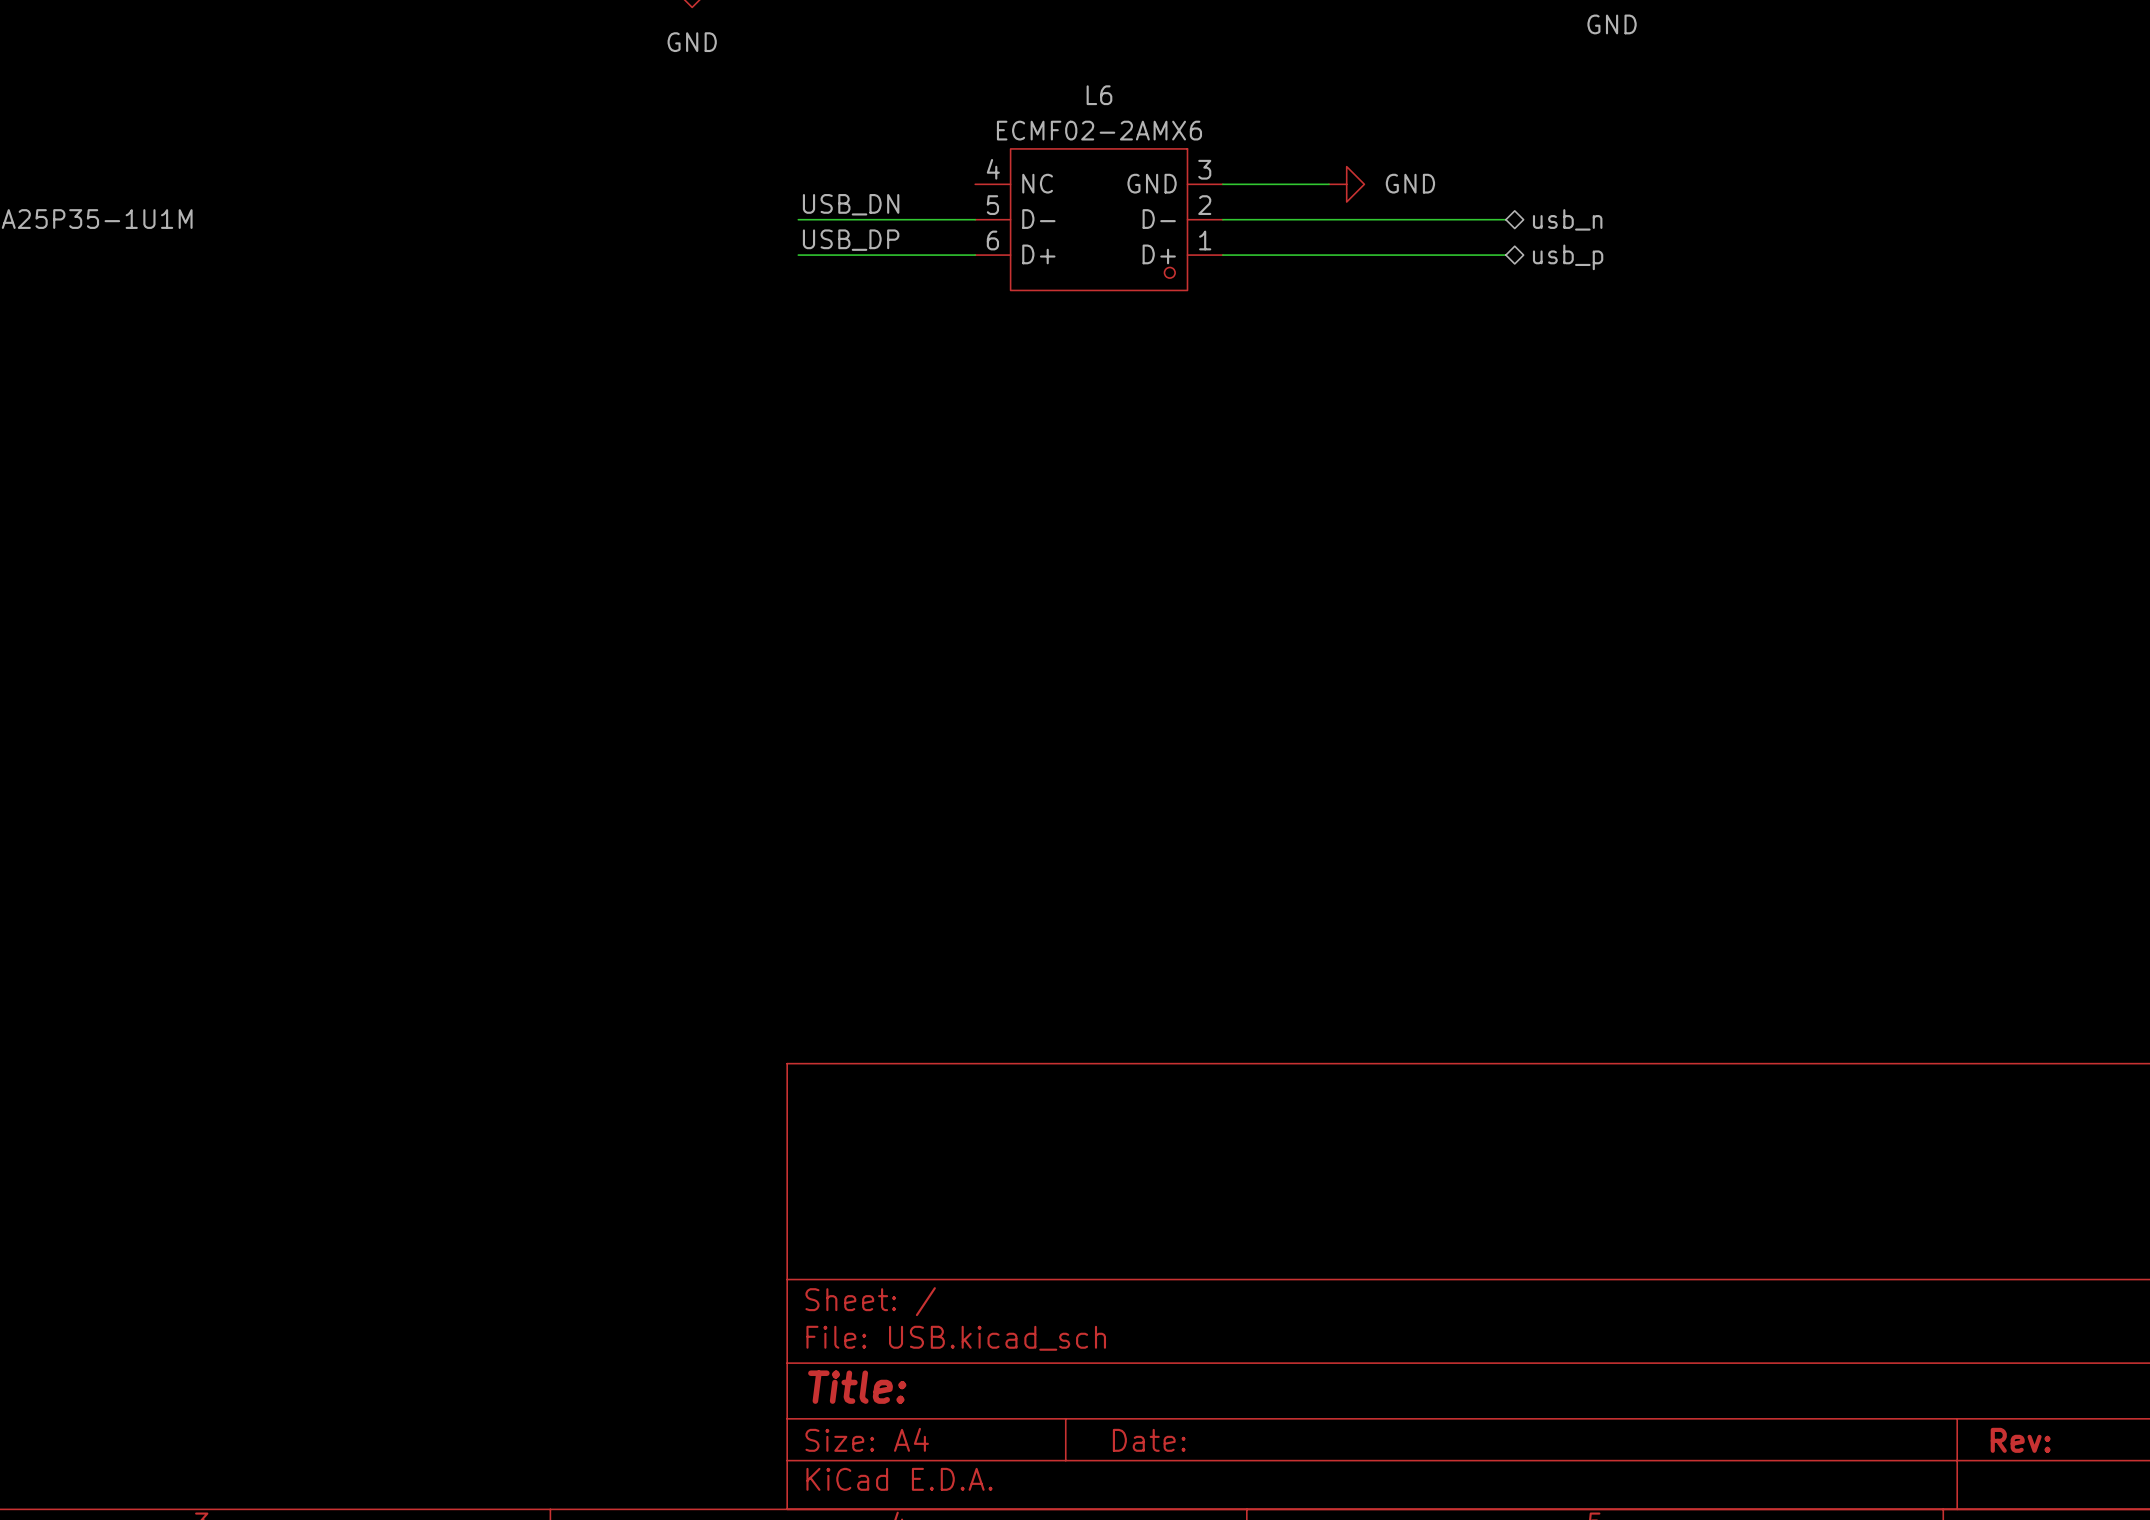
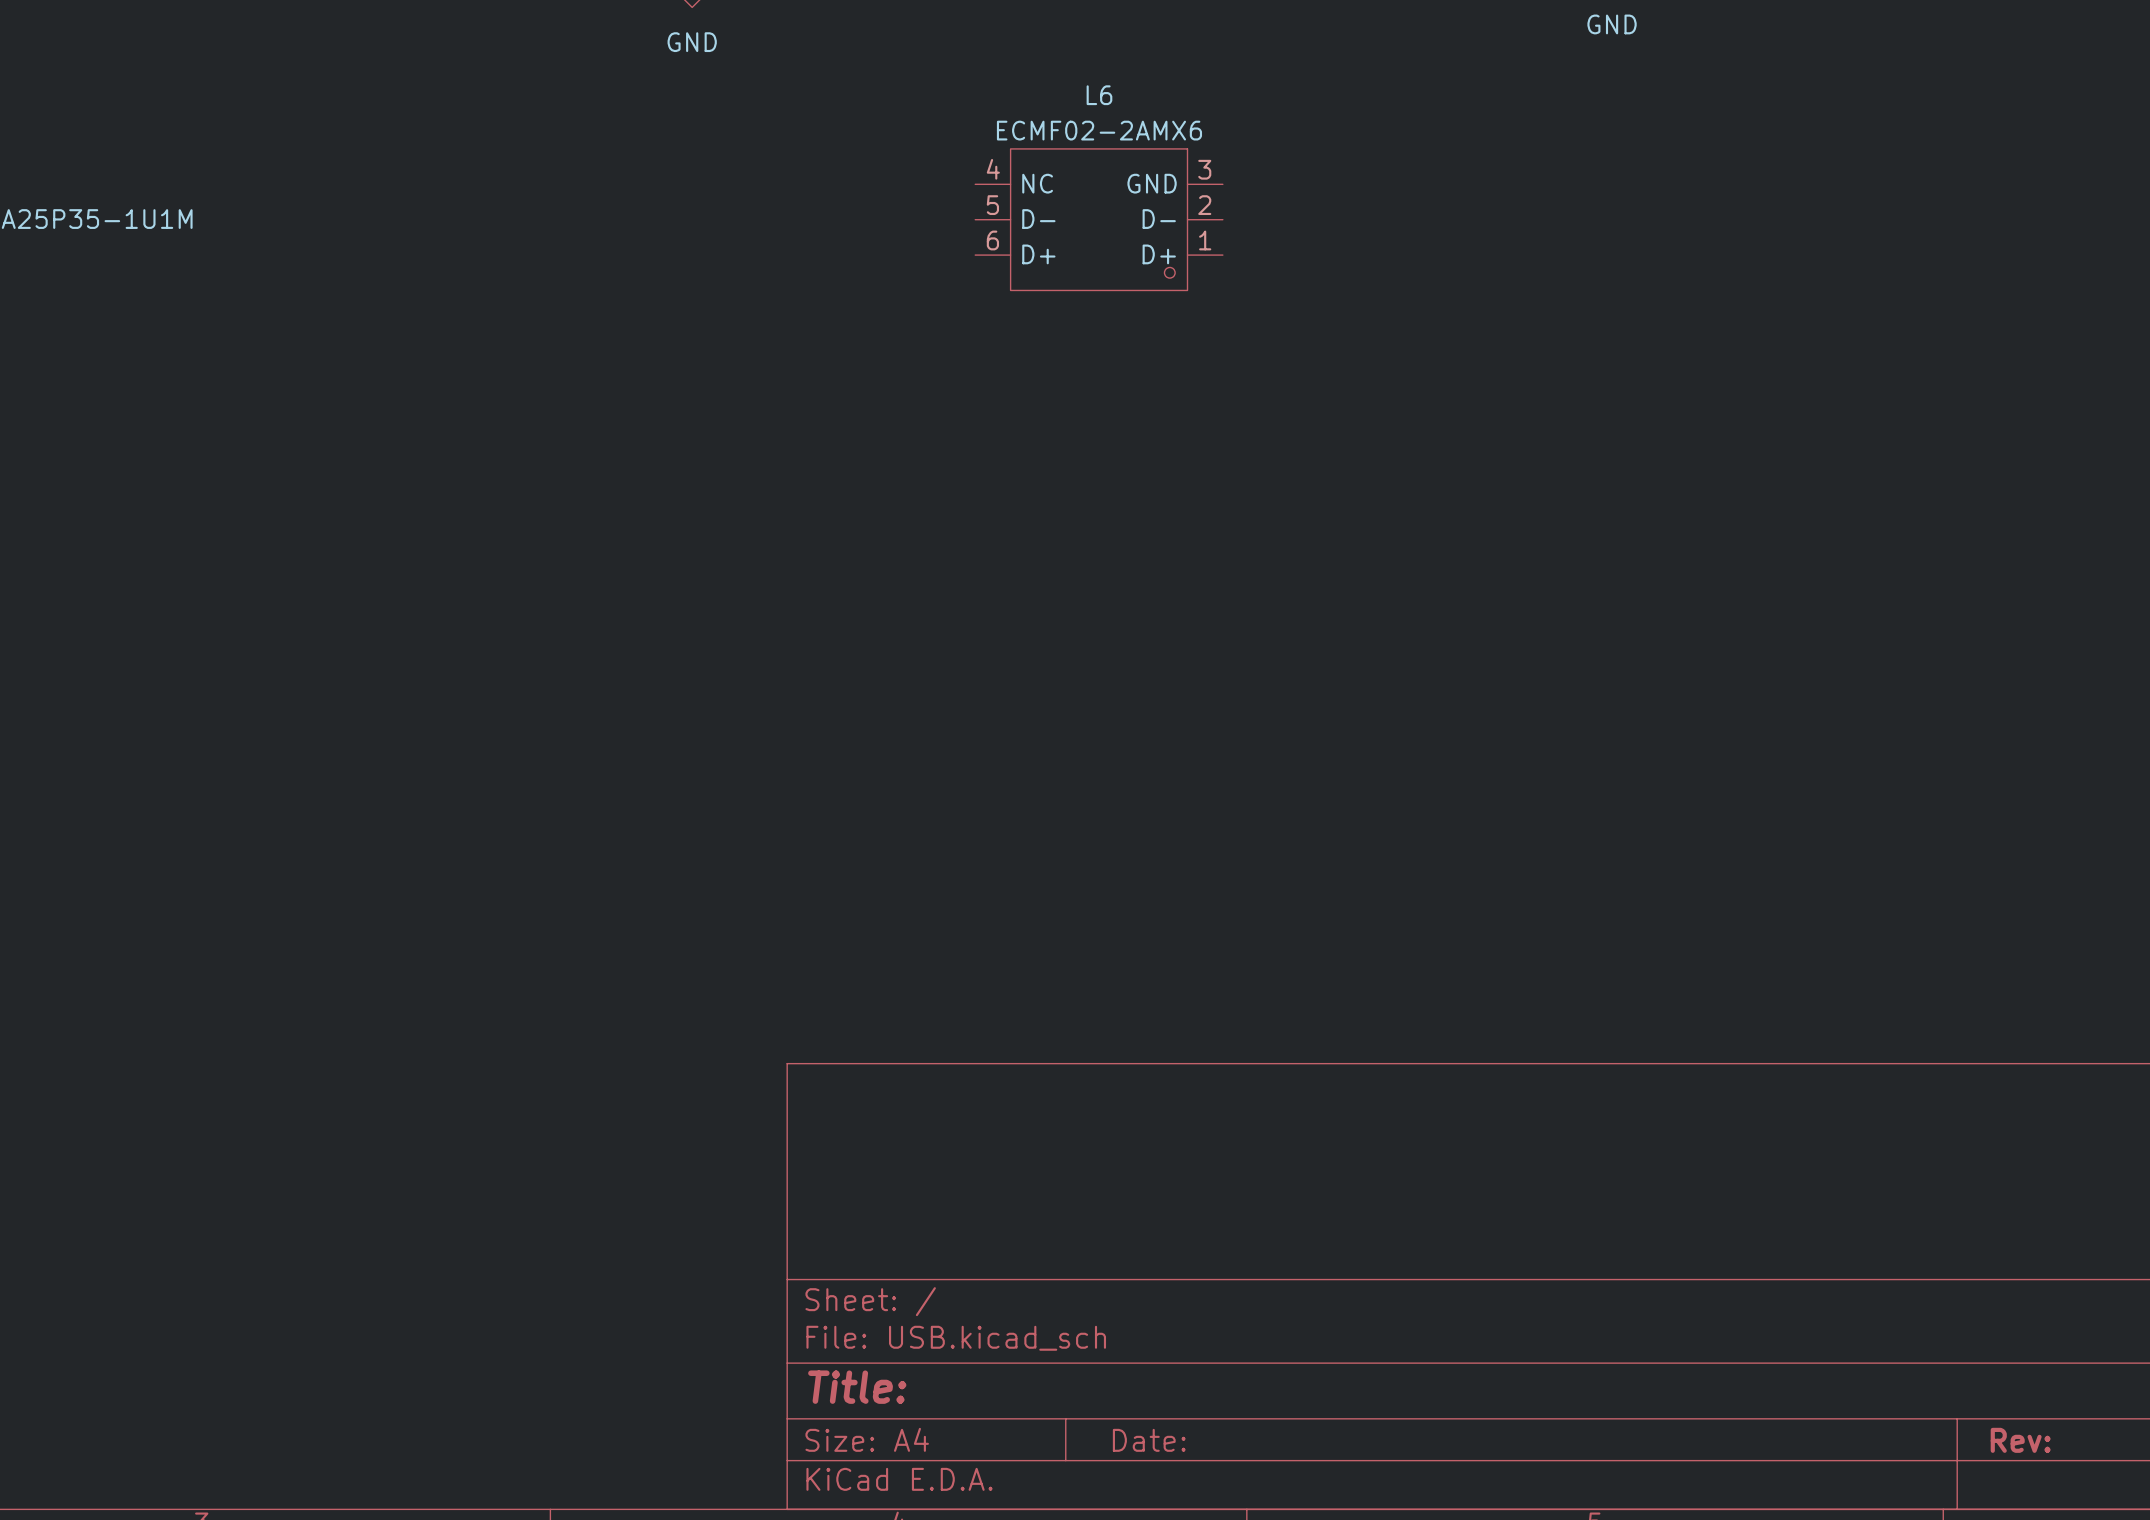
wire: (1222, 184) (1329, 184) -> none
power symbol: GND (1346, 184) -> none
label: USB_DN (851, 204) -> none
wire: (798, 219) (975, 219) -> none
wire: (1222, 219) (1505, 219) -> none
hierarchical label: usb_n (1567, 219) -> none
label: USB_DP (851, 240) -> none
wire: (798, 255) (975, 255) -> none
wire: (1222, 255) (1505, 255) -> none
hierarchical label: usb_p (1568, 257) -> none

